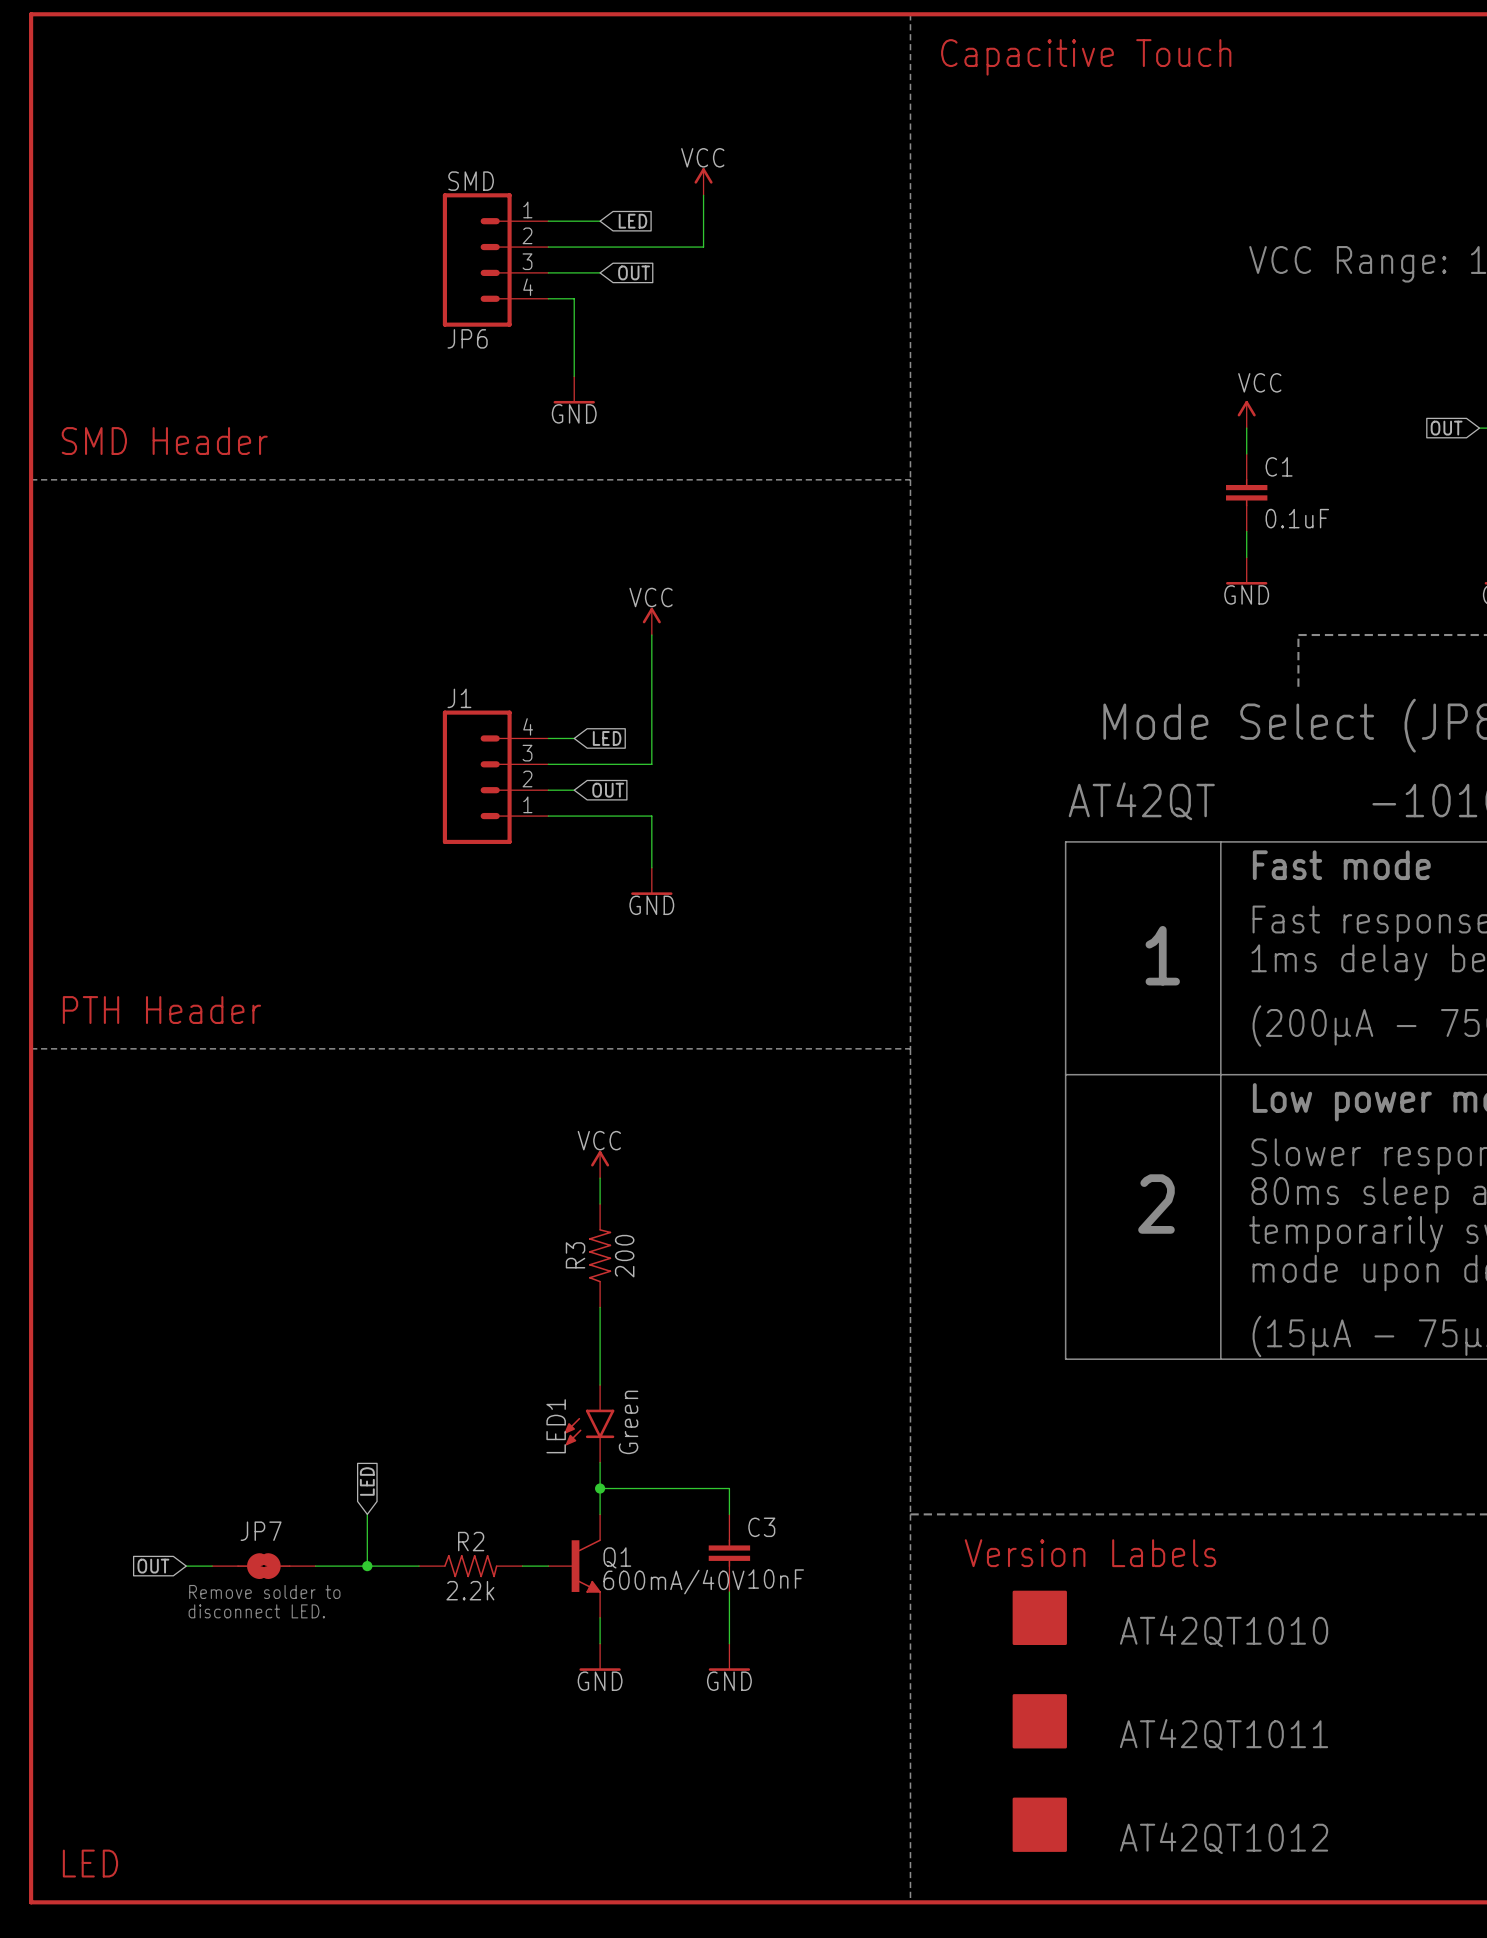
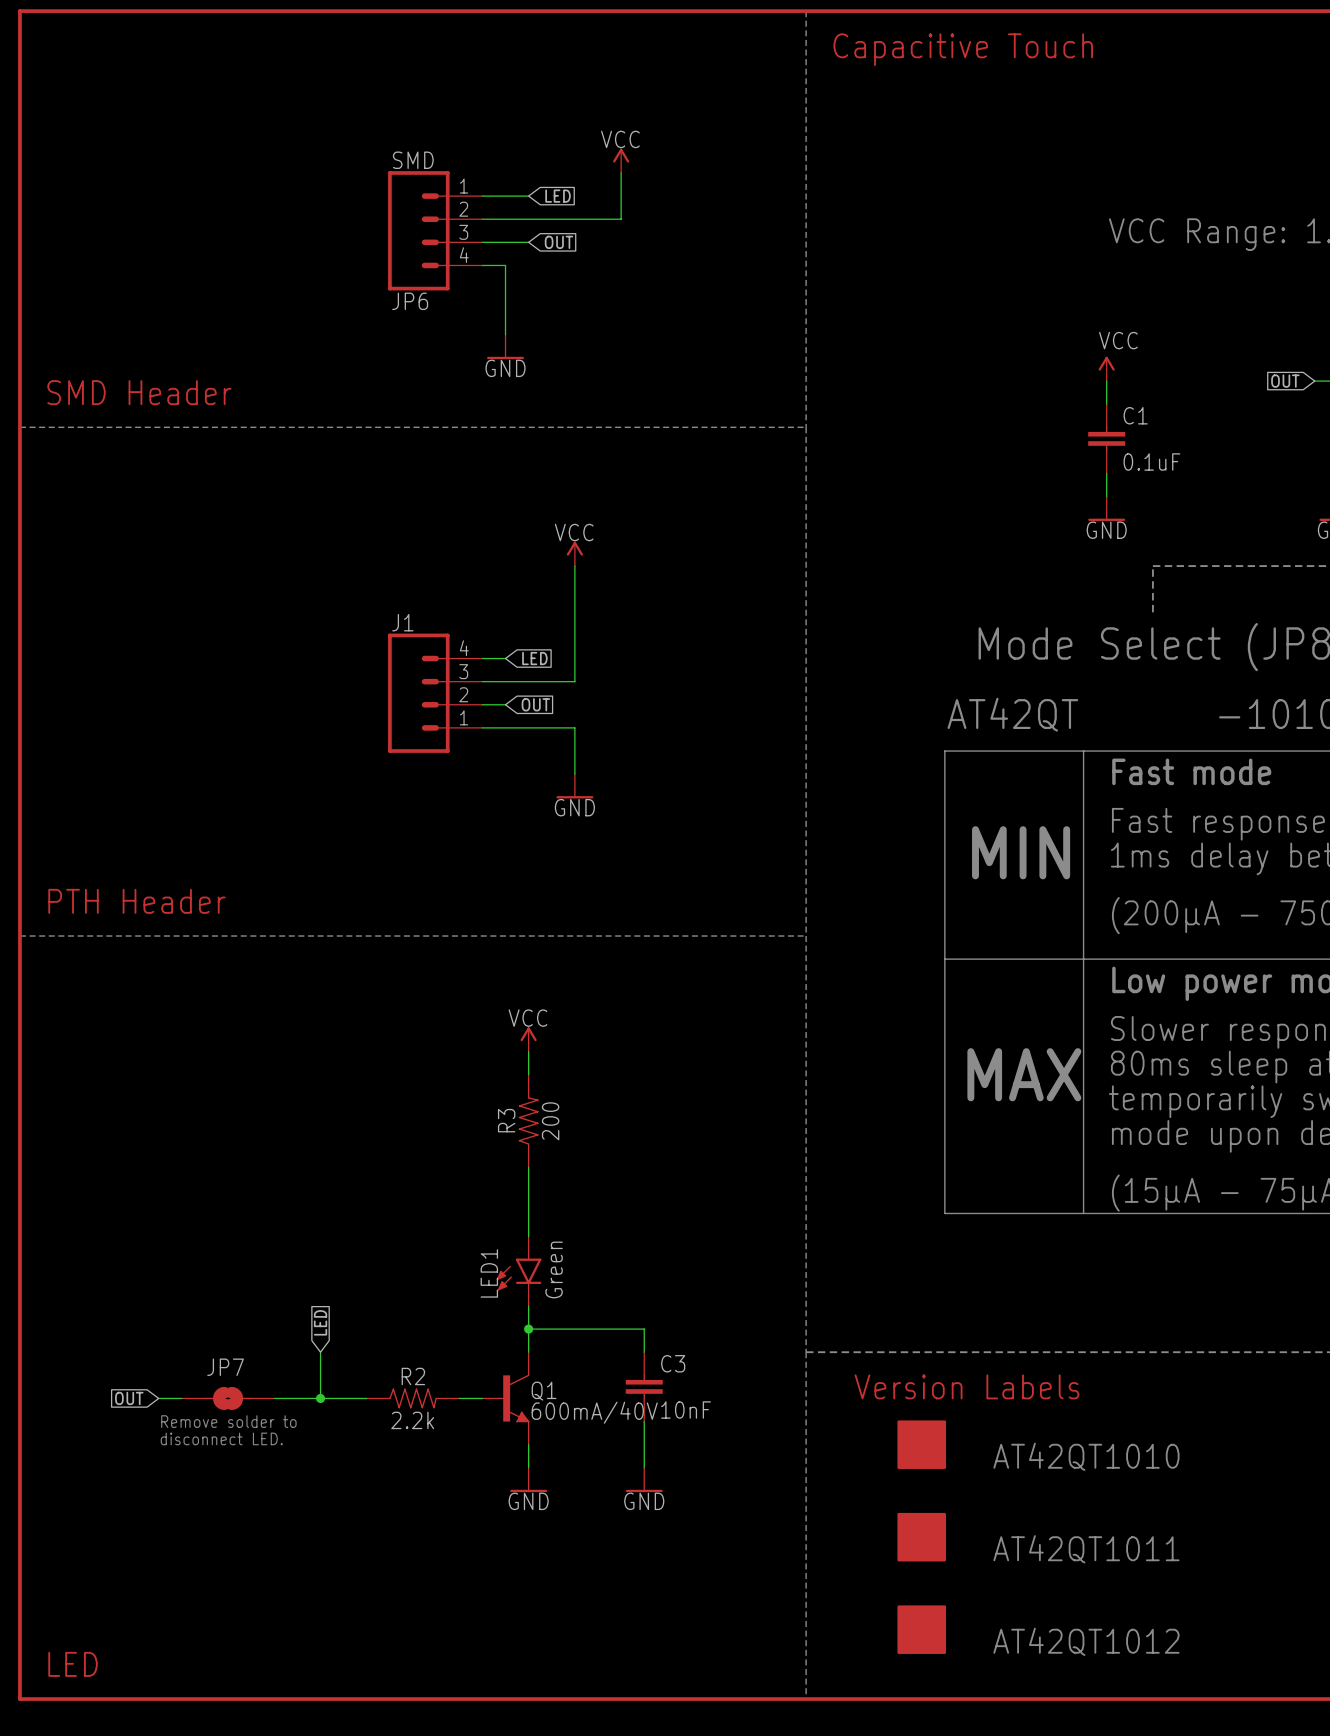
text: none -> MIN (1021, 852)
text: 1 (1162, 955) -> none
text: none -> MAX (1024, 1074)
text: 2 (1156, 1204) -> none

